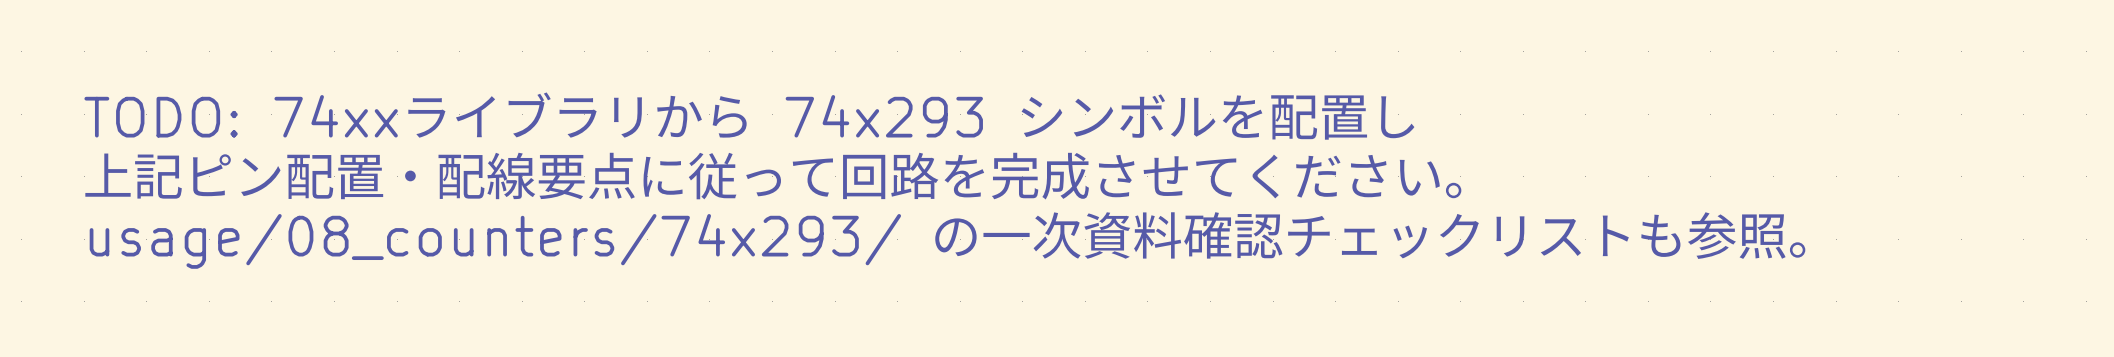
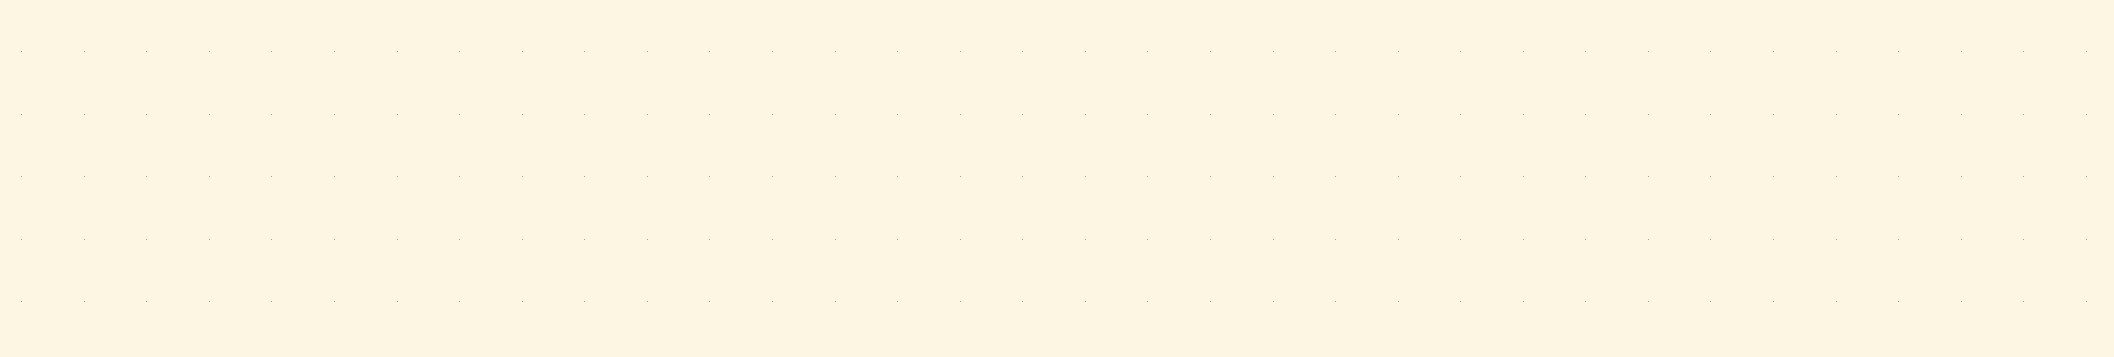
text: TODO: 74xxライブラリから 74x293 シンボルを配置し (750, 116) -> none
text: 上記ピン配置・配線要点に従って回路を完成させてください。 (773, 176) -> none
text: usage/08_counters/74x293/ の一次資料確認チェックリストも参照。 (948, 239) -> none

